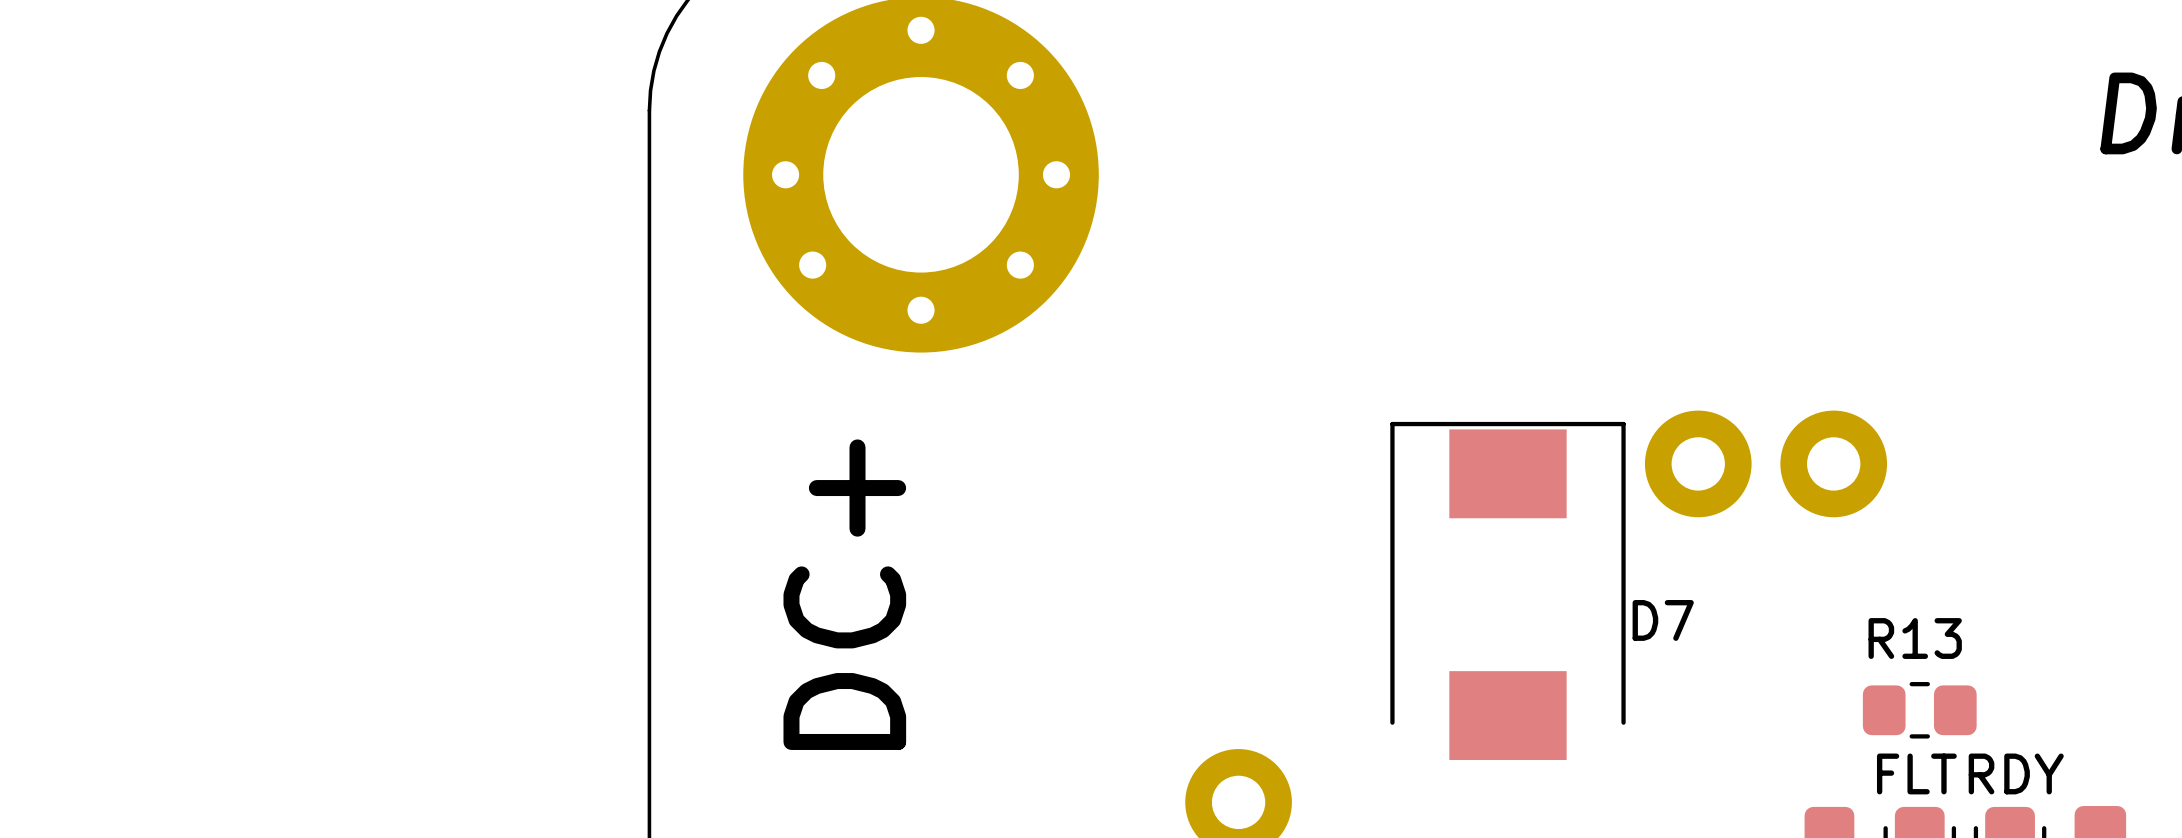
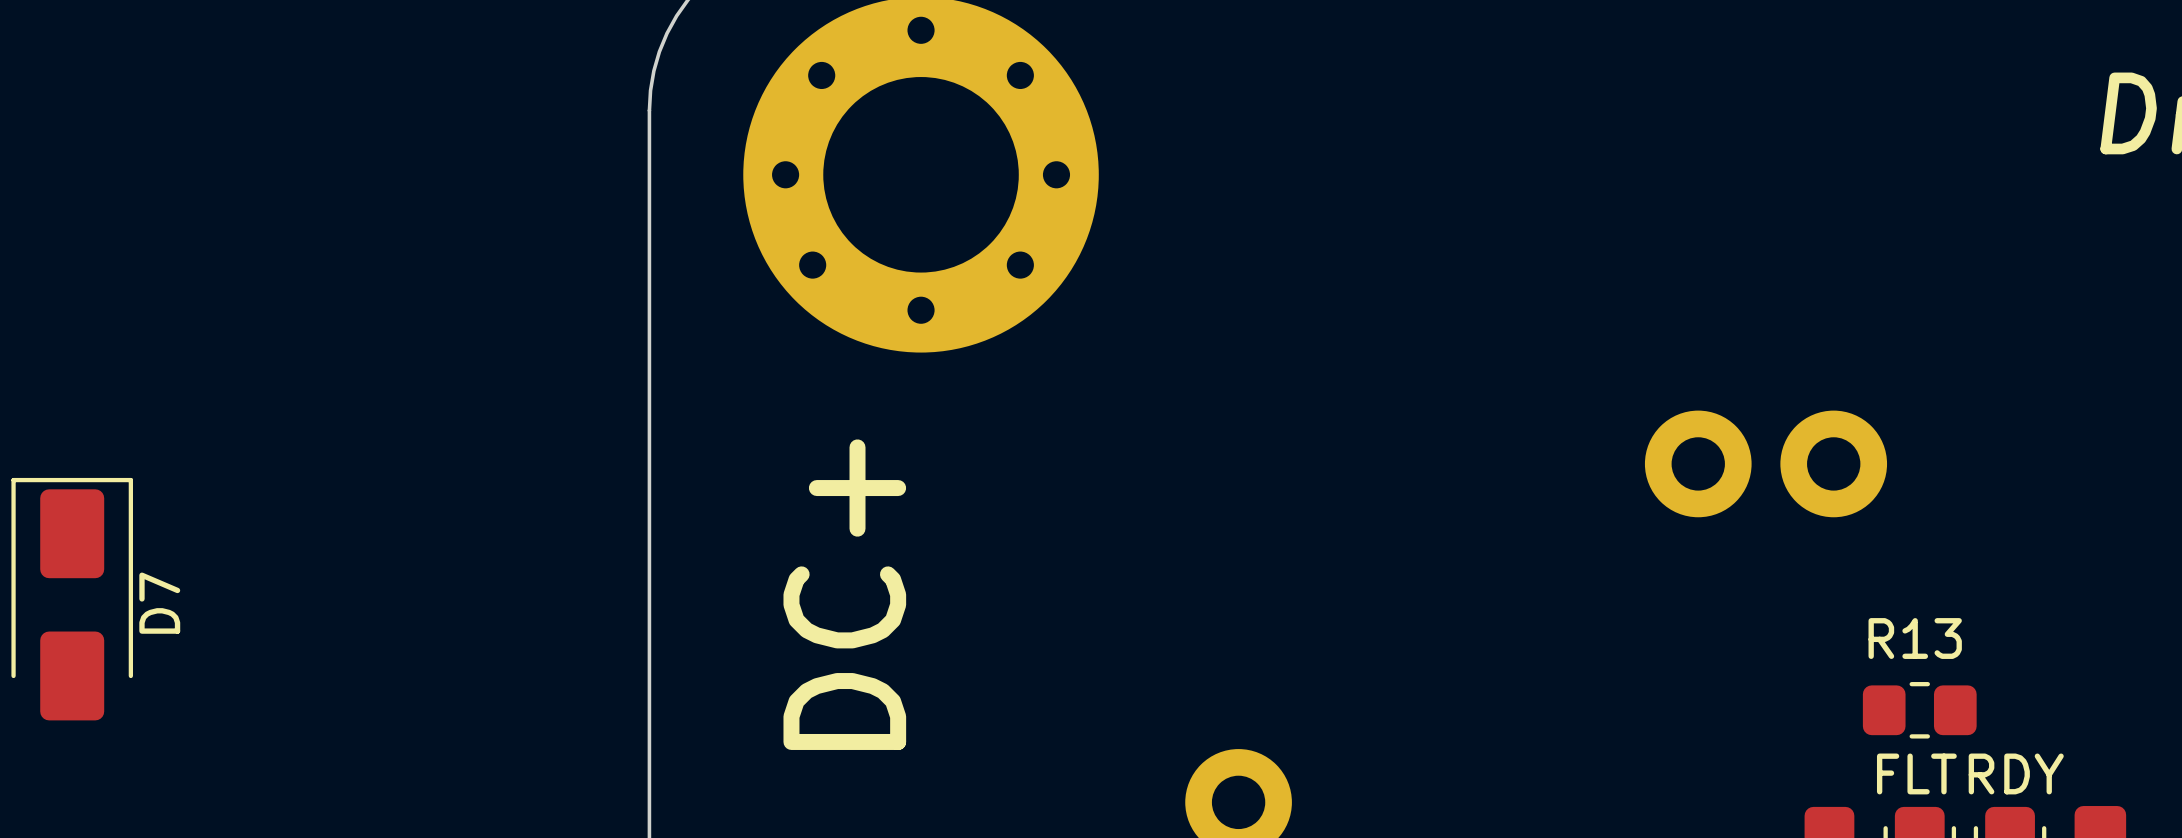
D7 footprint: [1390, 421, 1626, 761] -> [11, 477, 134, 721]

